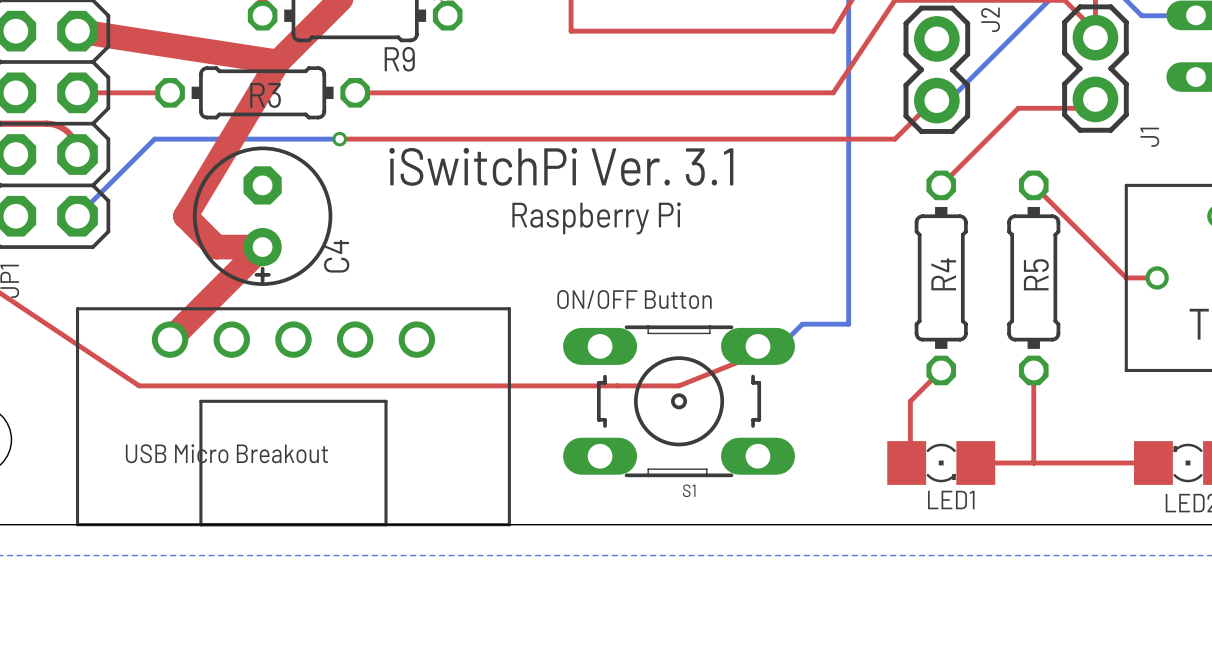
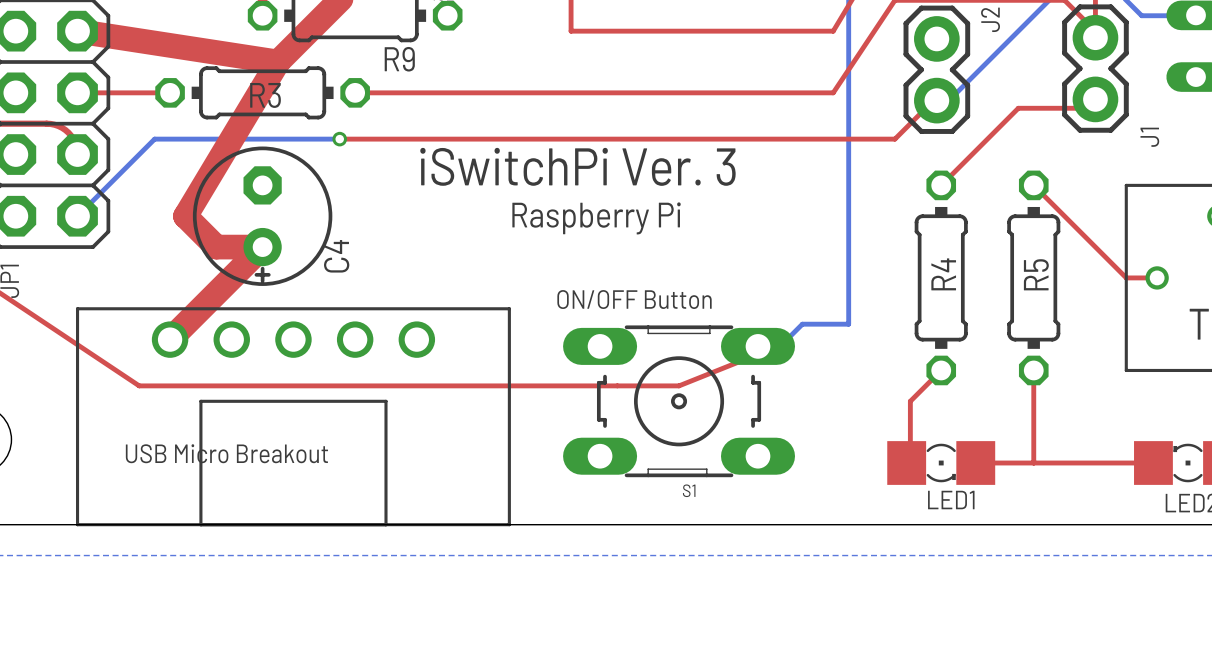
text: iSwitchPi Ver. 3.1 (561, 166) -> iSwitchPi Ver. 3 (577, 166)

